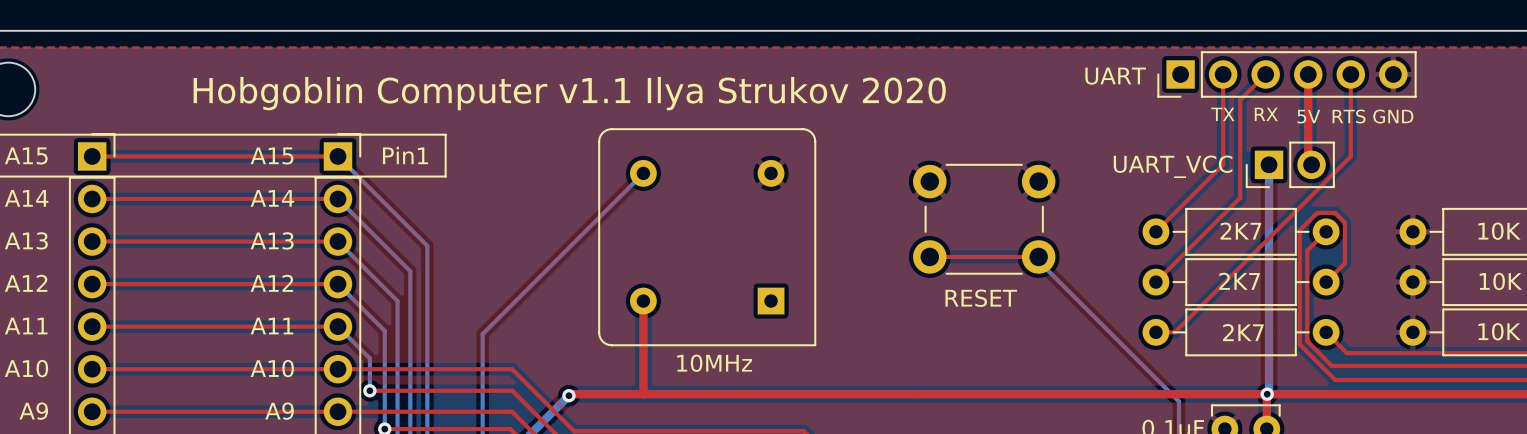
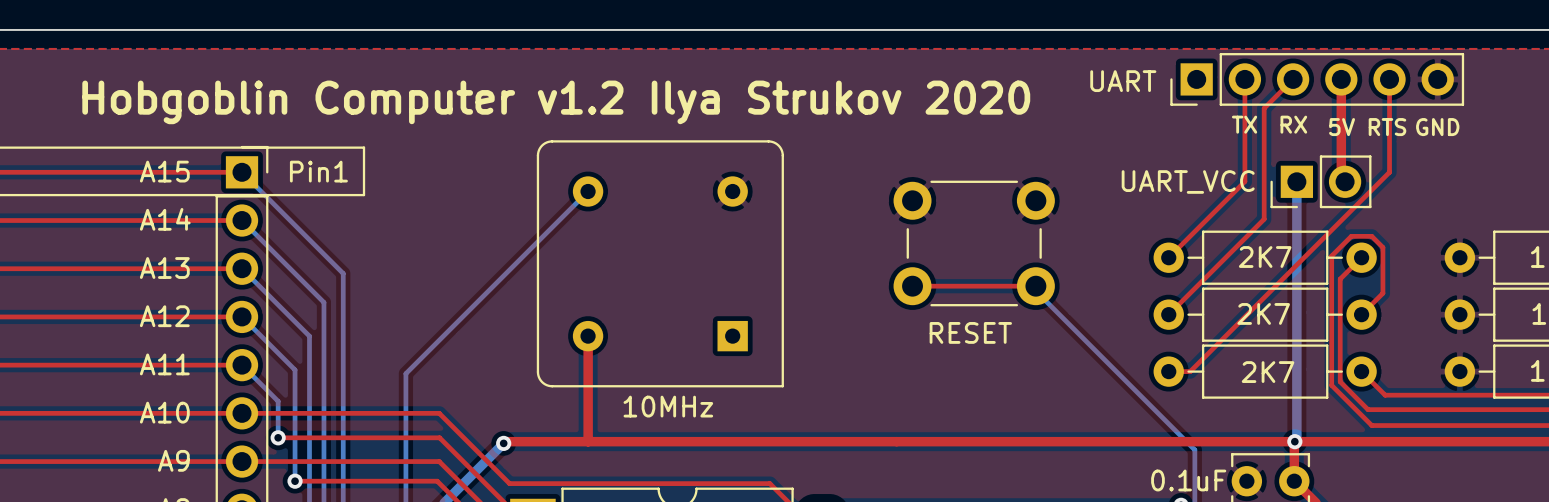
text: Hobgoblin Computer v1.1 Ilya Strukov 2020 (569, 93) -> Hobgoblin Computer v1.2 Ilya Strukov 2020 (556, 102)

